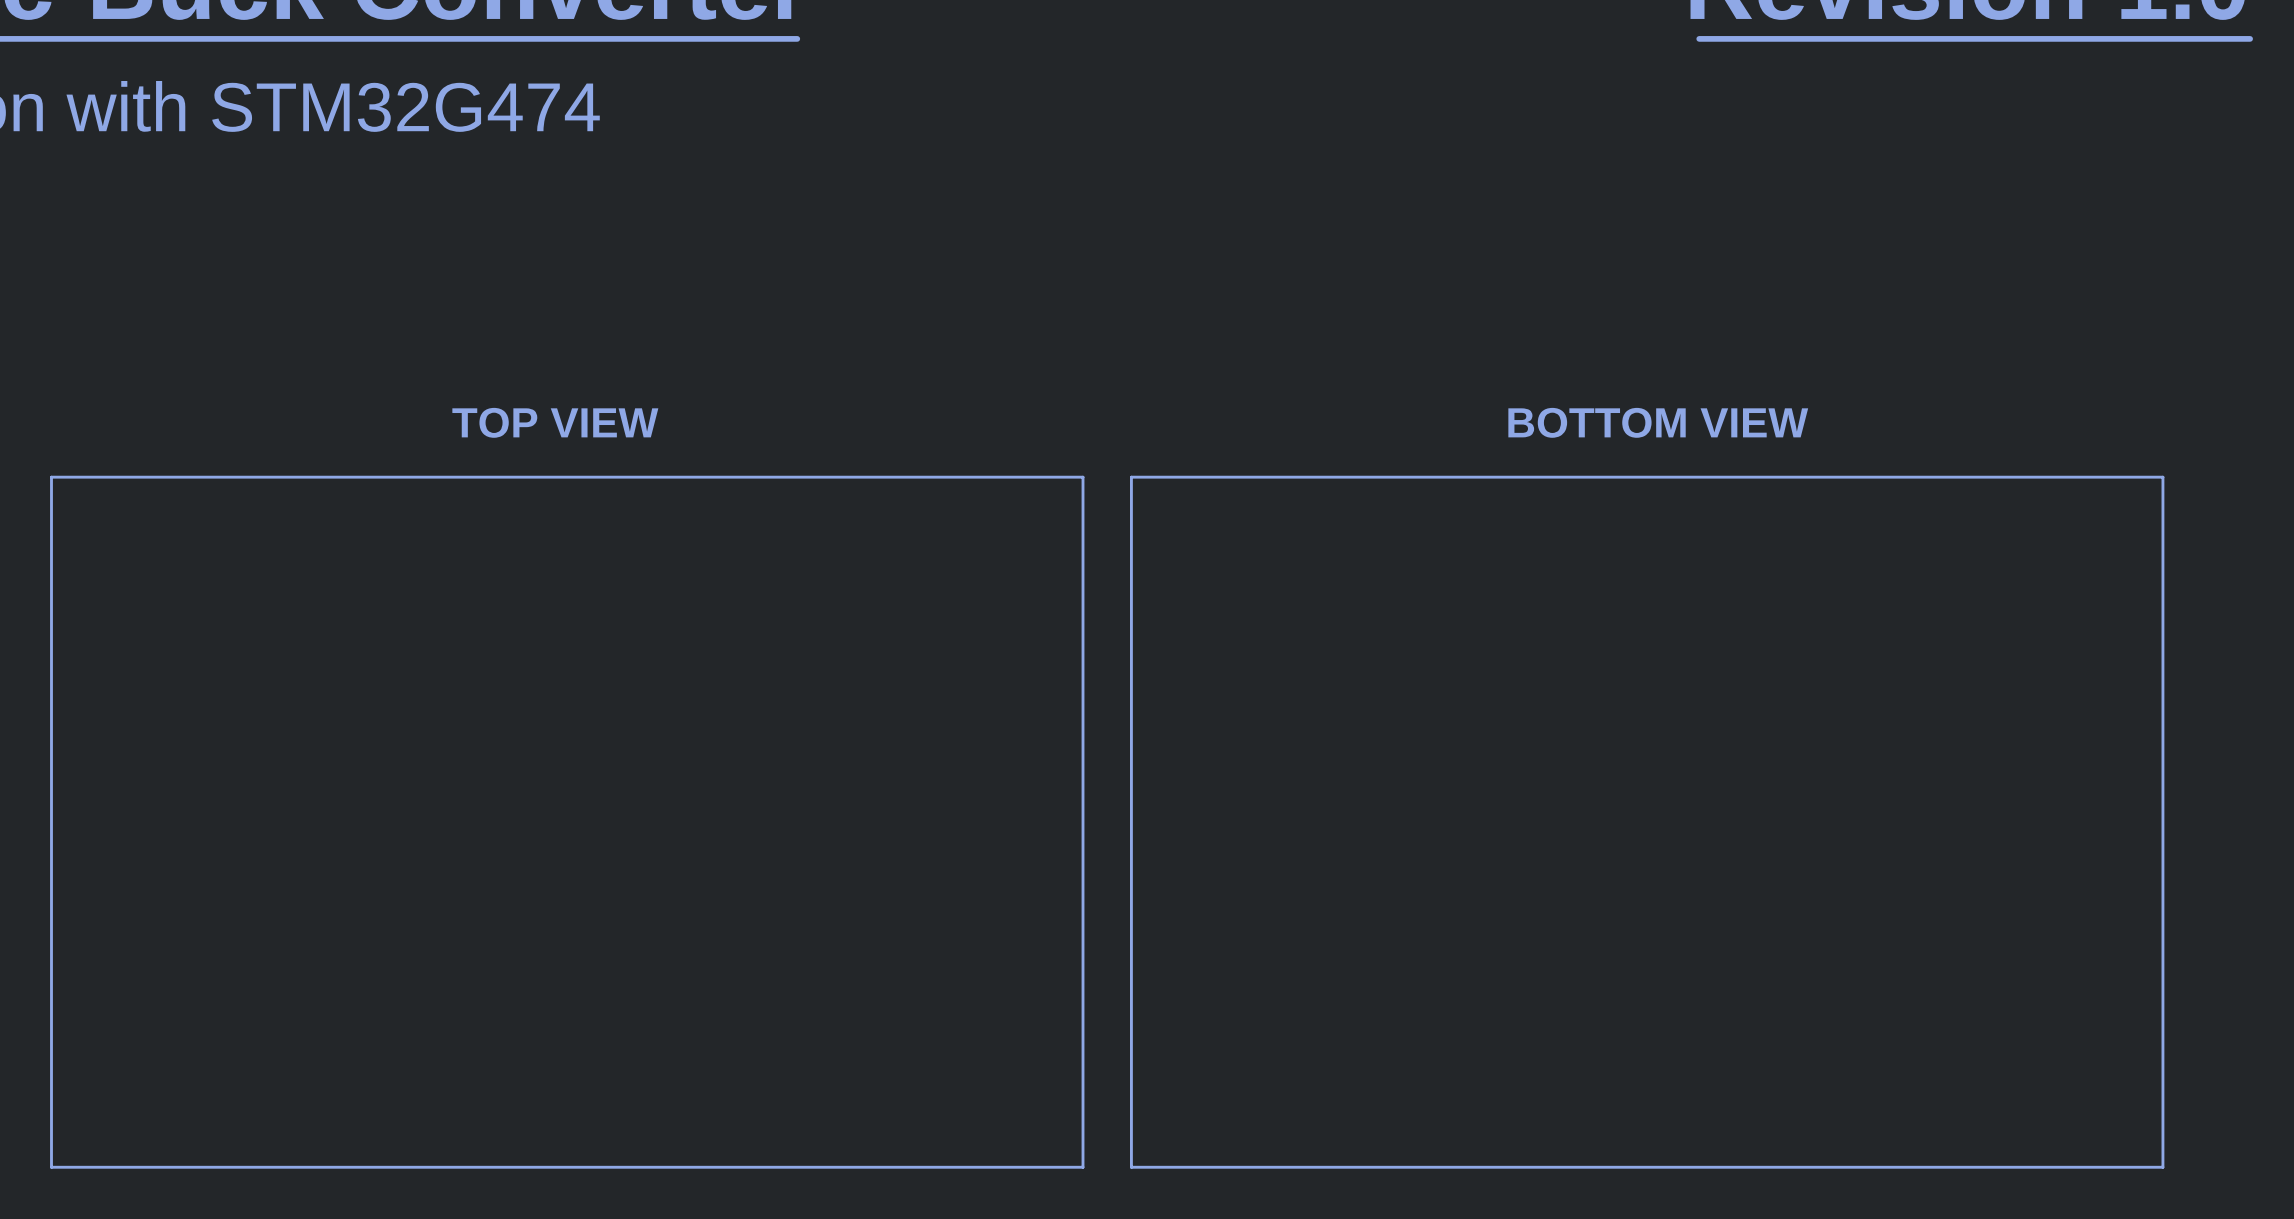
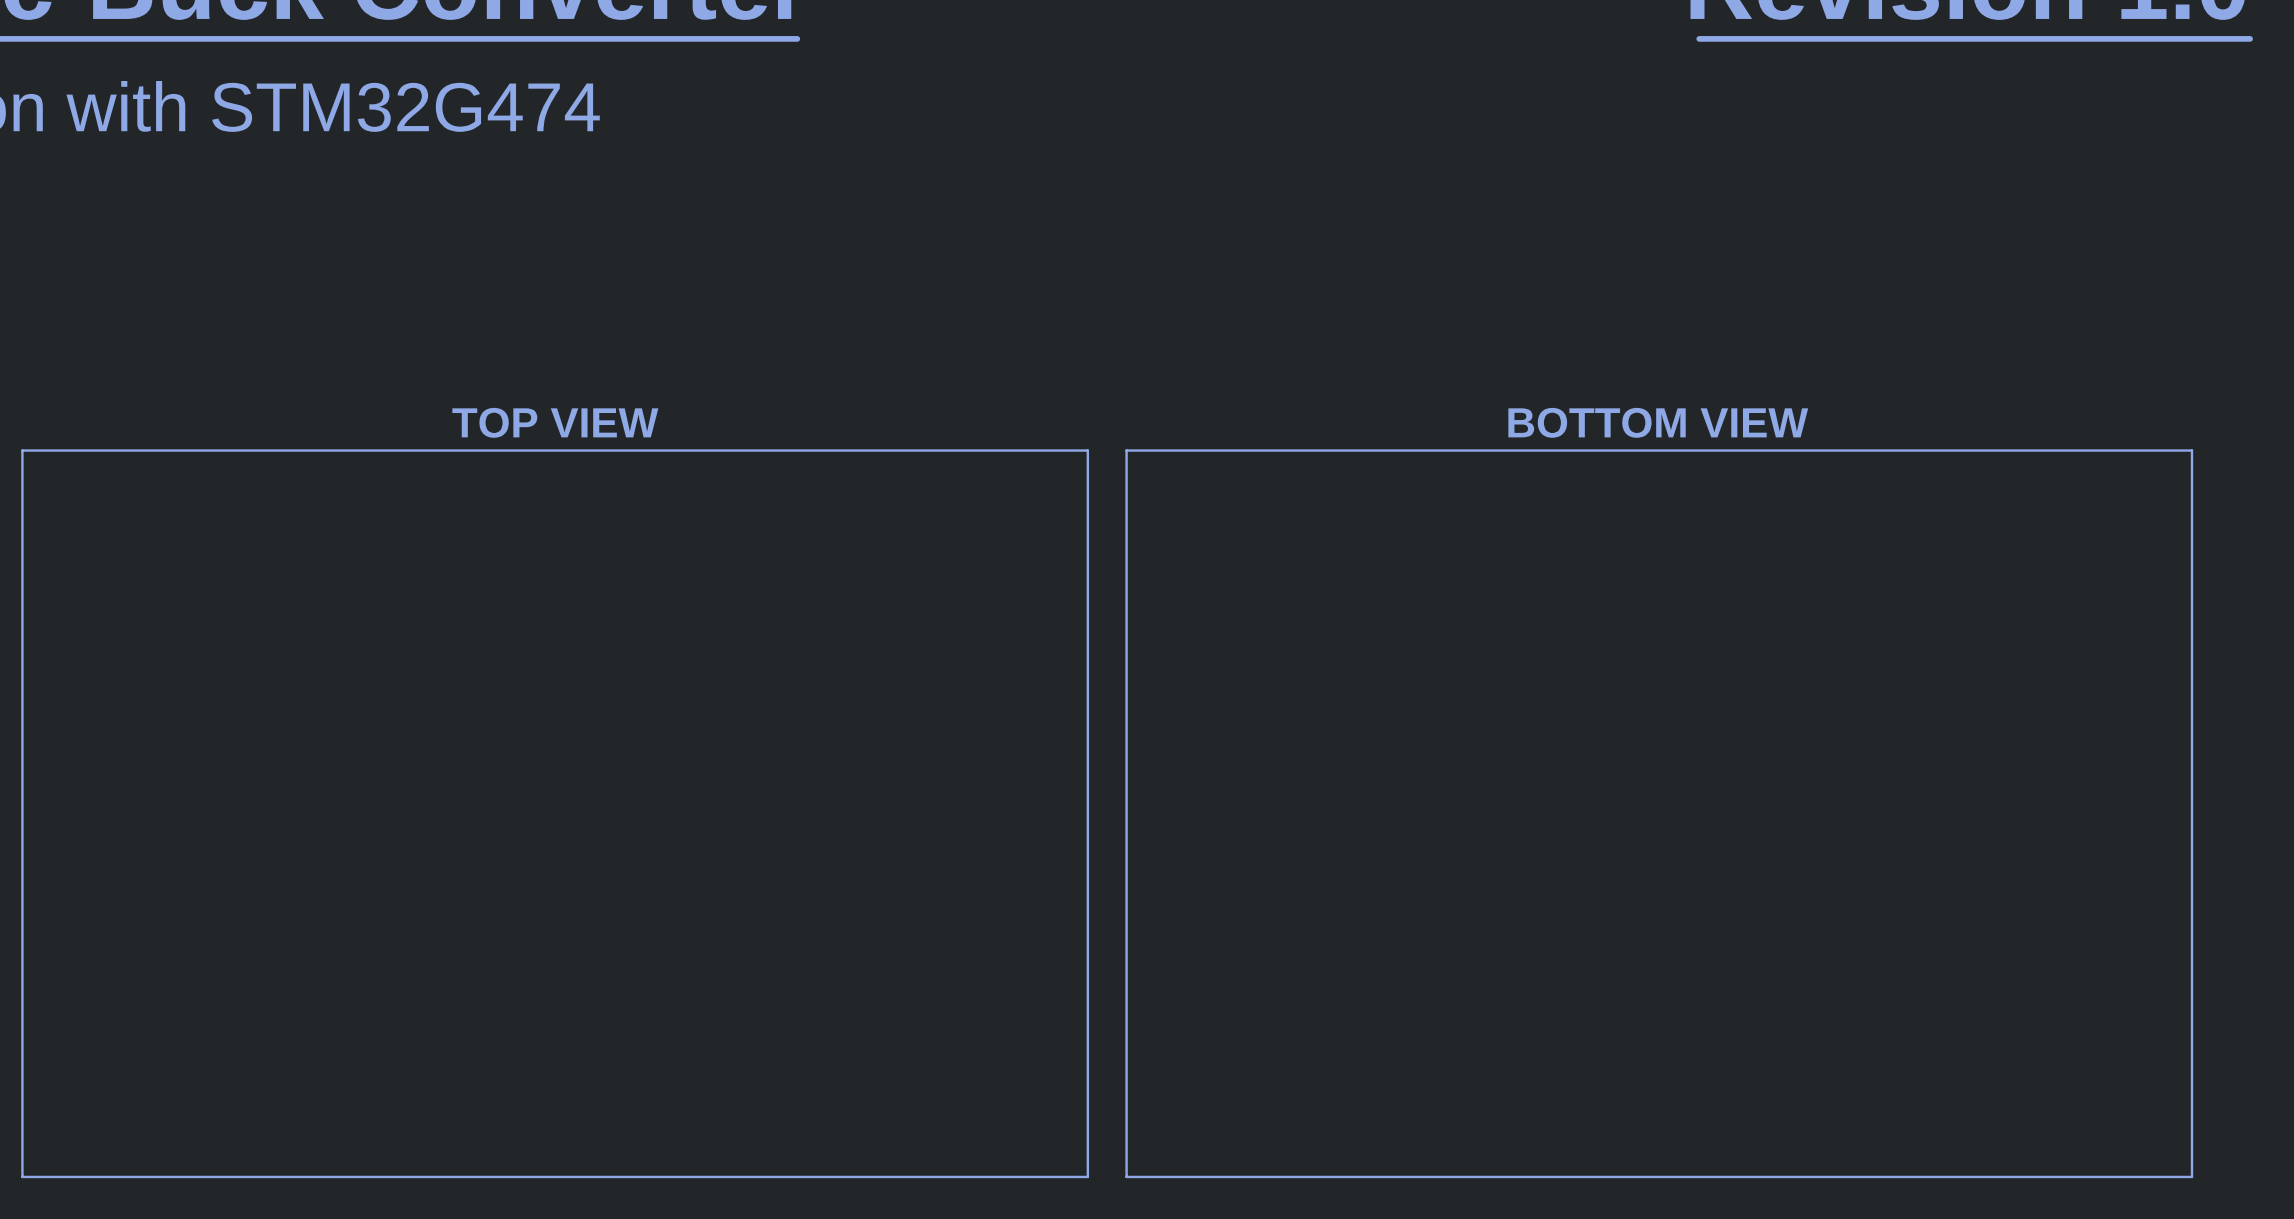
line: (51, 477) (1083, 477) (1083, 1167) (51, 1167) (51, 477) -> (22, 450) (22, 1176) (1087, 1176) (1087, 450) (22, 450)
line: (1131, 477) (2162, 477) (2162, 1167) (1131, 1167) (1131, 477) -> (1126, 450) (1126, 1176) (2192, 1176) (2192, 450) (1126, 450)

